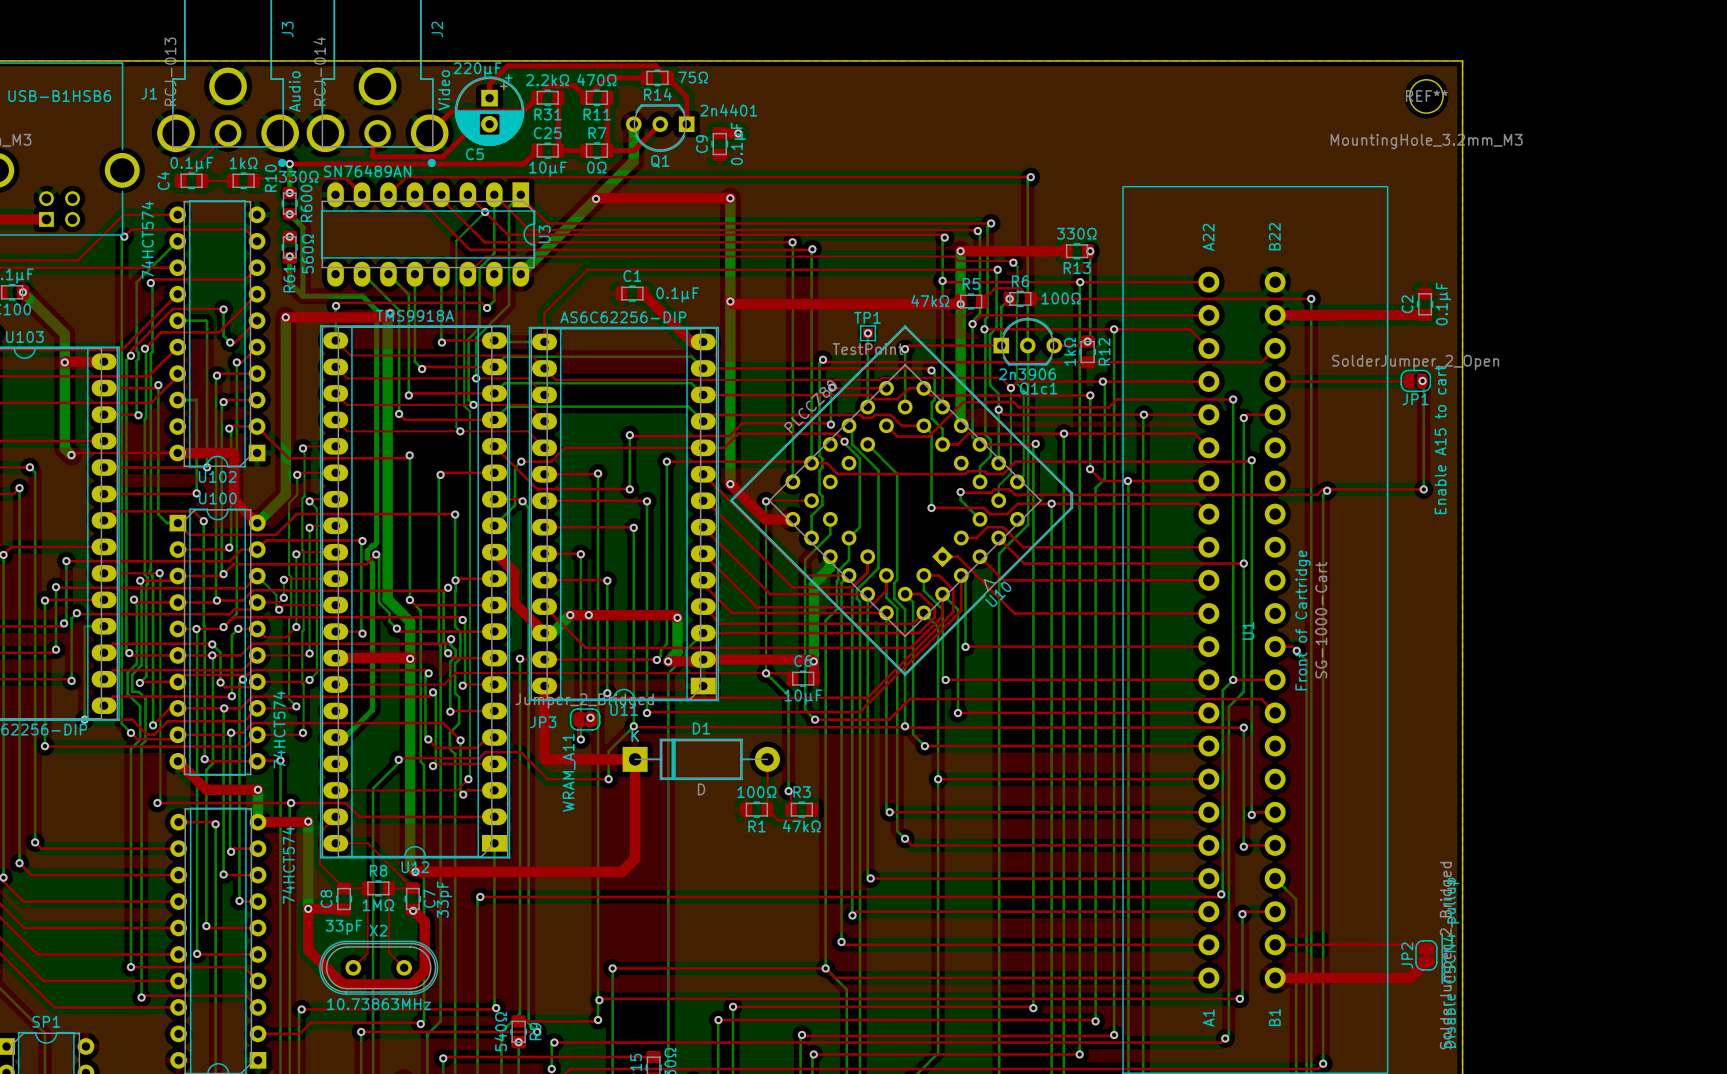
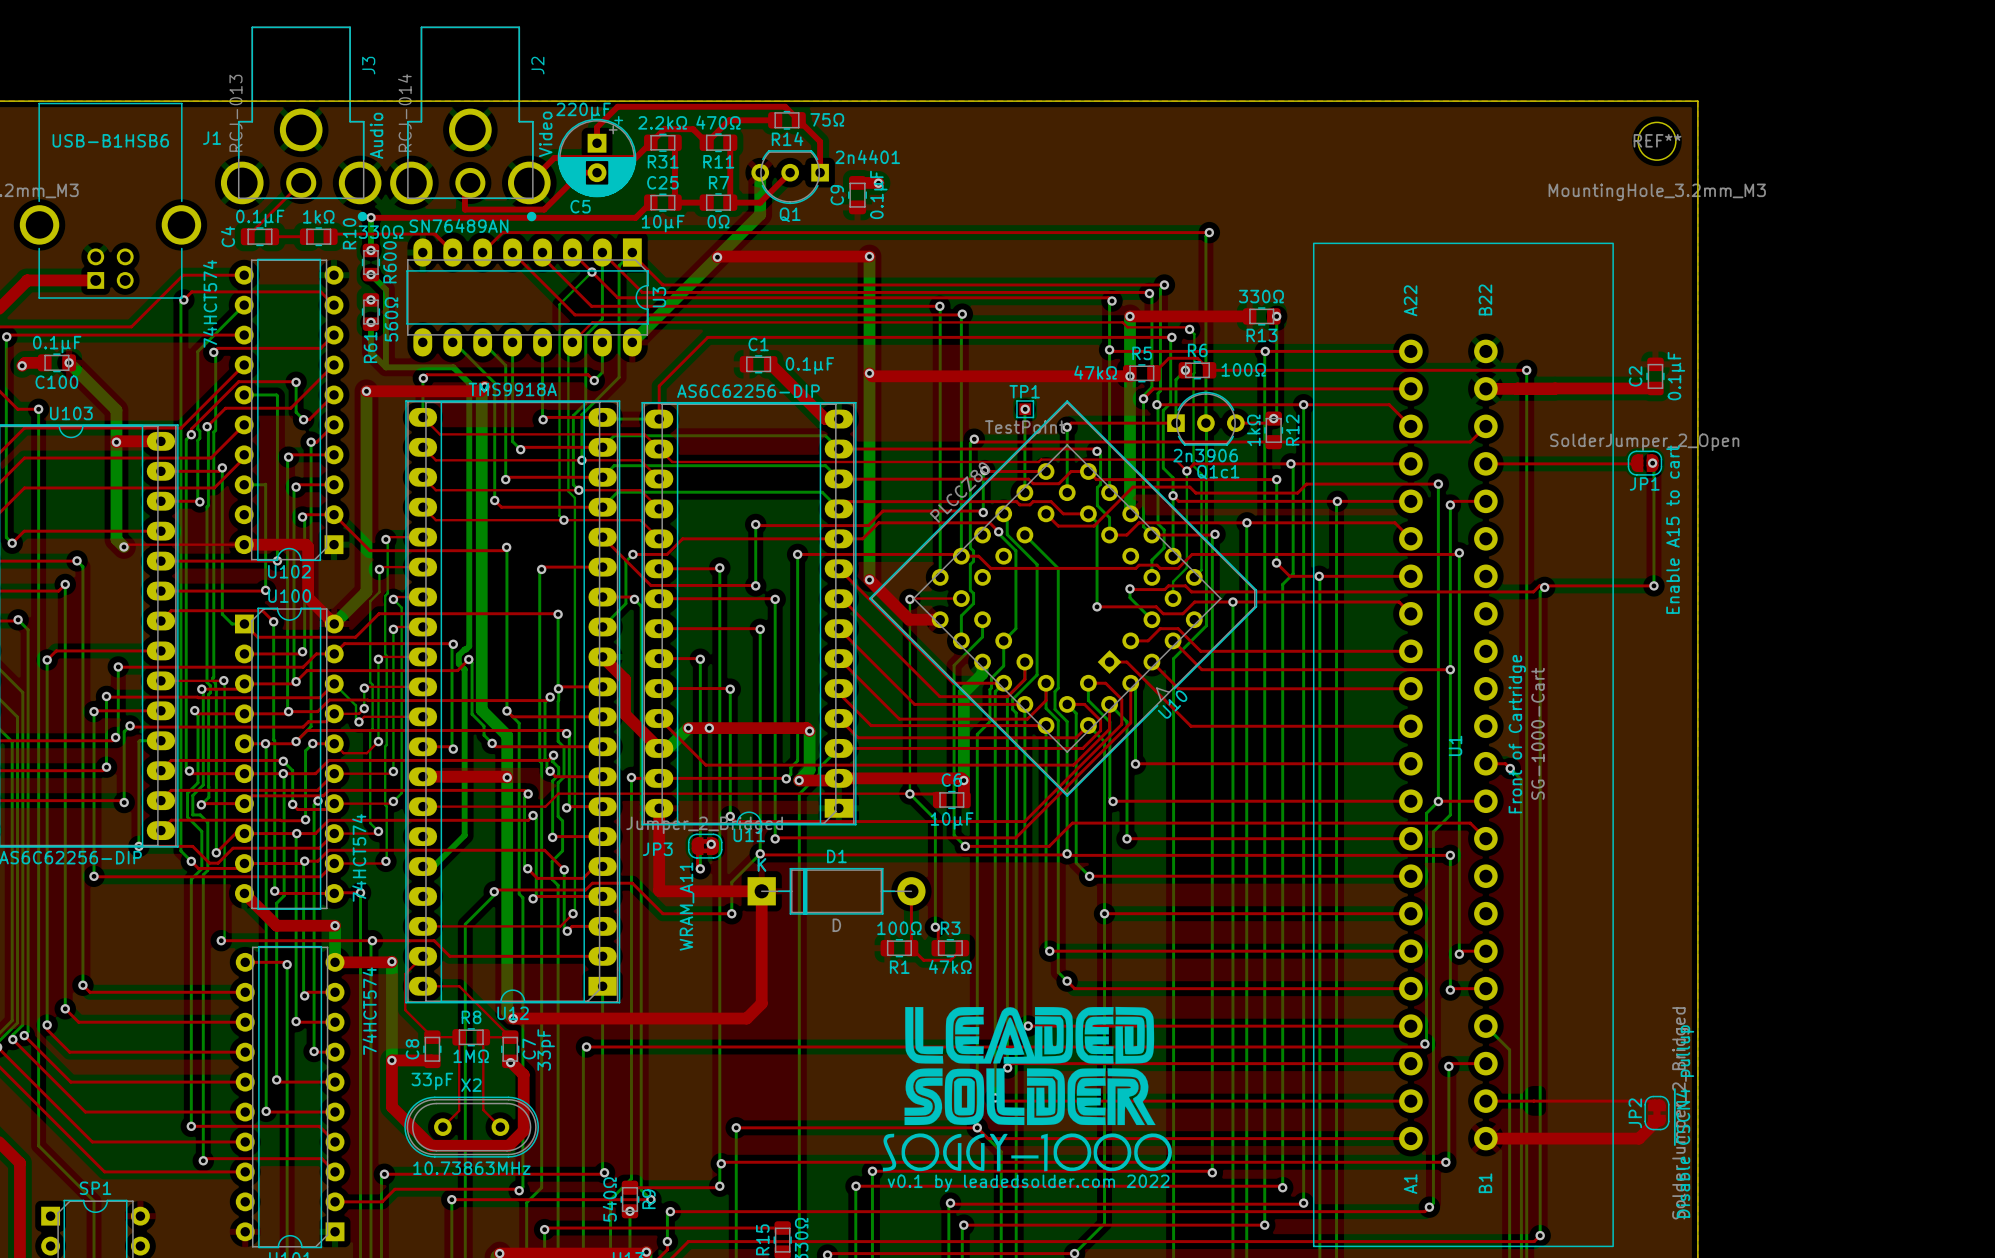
drawing: none -> [882, 1006, 1172, 1172]
text: none -> v0.1 (905, 1181)
text: none -> by leadedsolder.com 2022 (1052, 1183)

